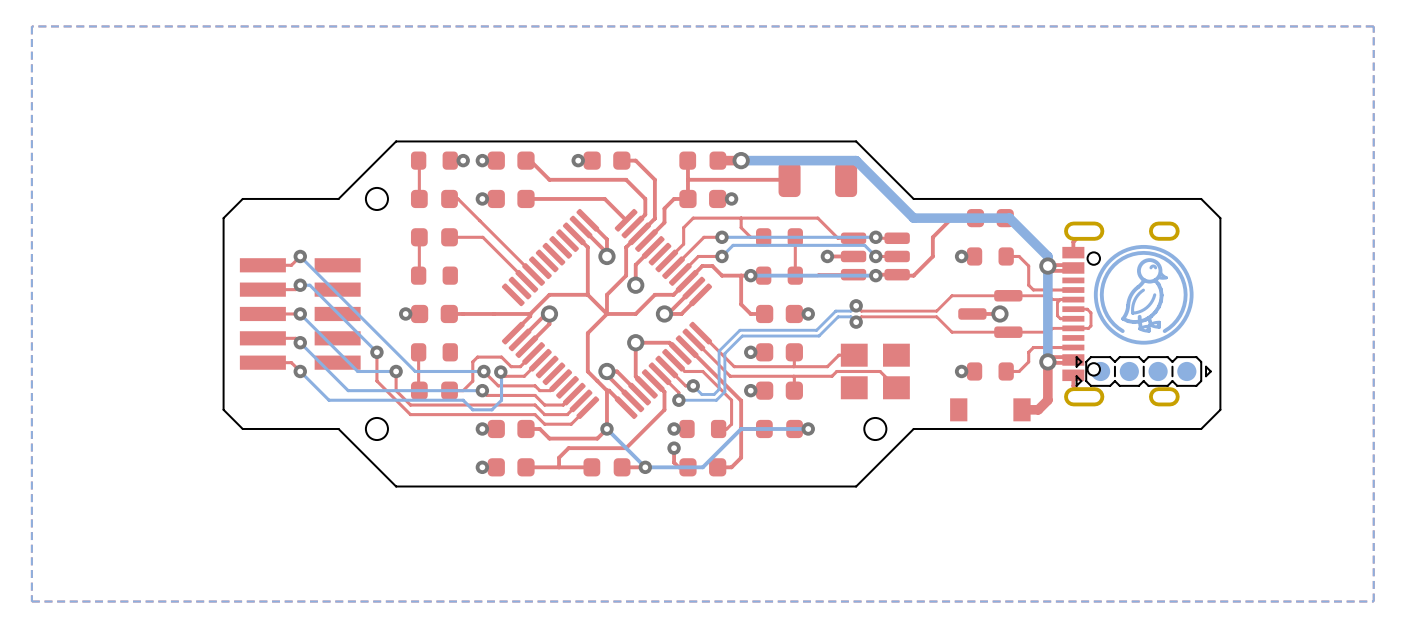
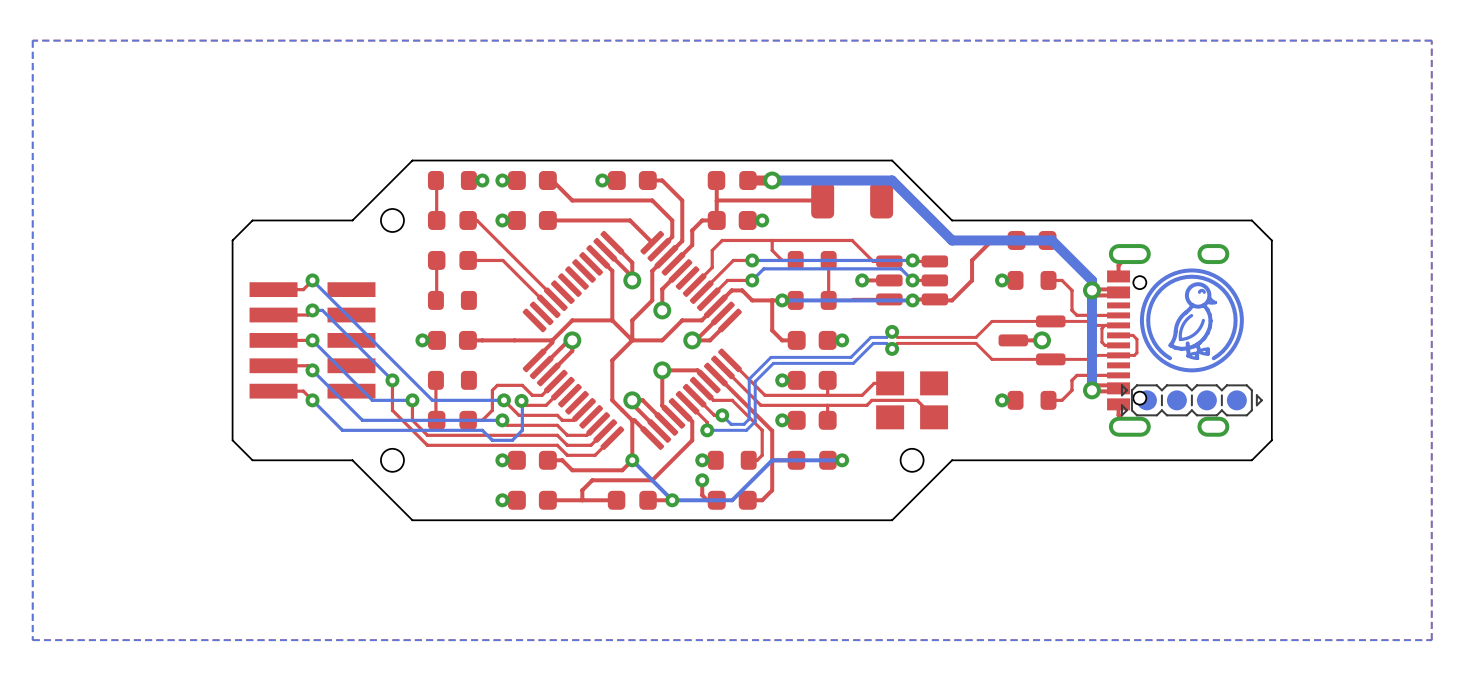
top track: (1047, 361) (1047, 400) (1038, 409) (1023, 409) -> none
part: (990, 409) -> none

